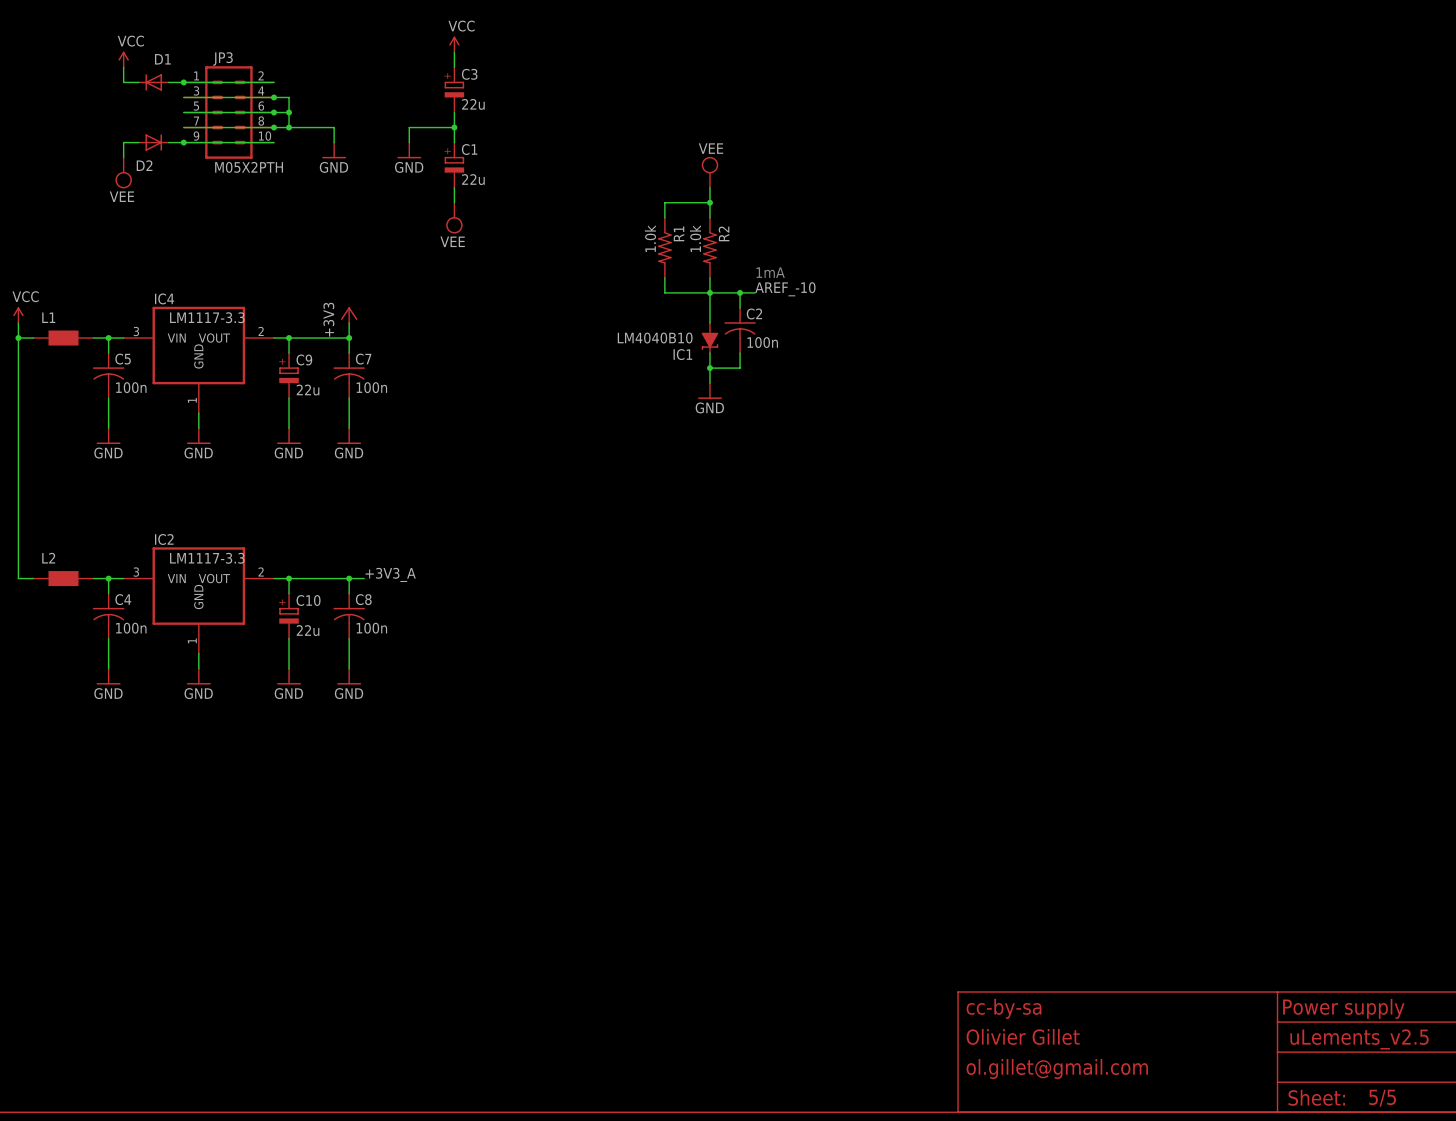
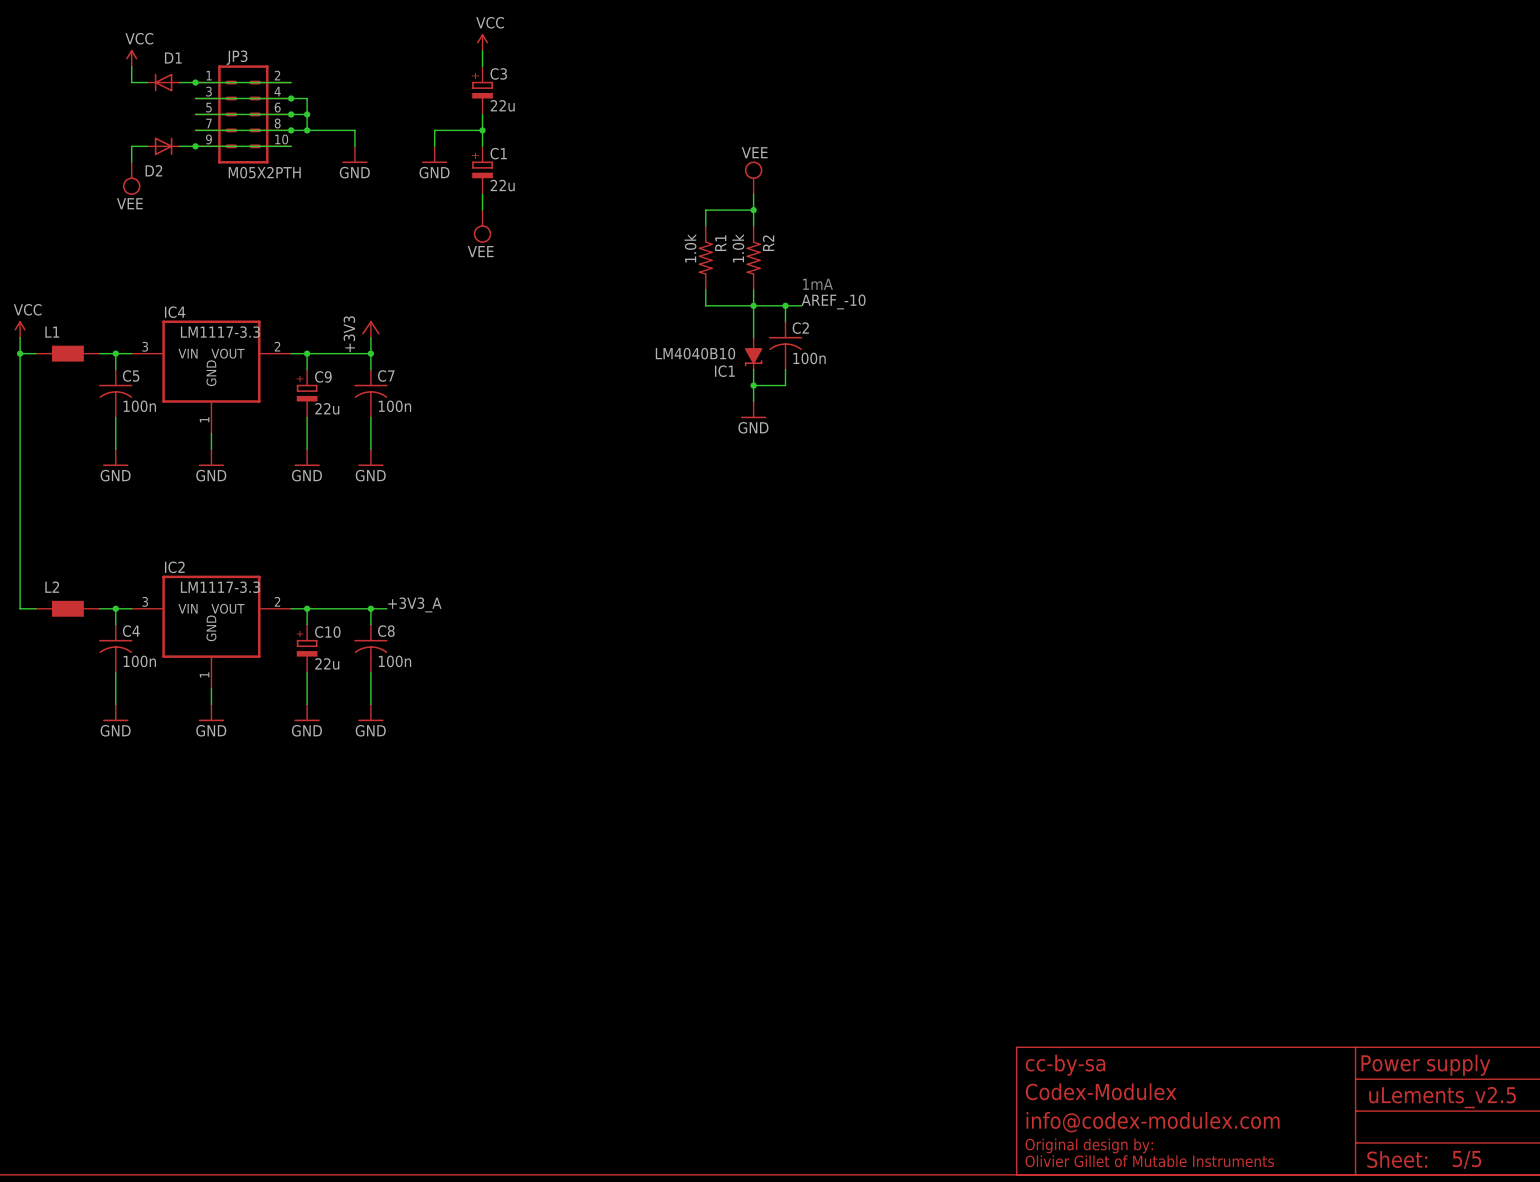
text: Olivier Gillet (1023, 1036) -> Codex-Modulex (1101, 1091)
text: none -> info@codex-modulex.com (1153, 1122)
text: ol.gillet@gmail.com (1057, 1069) -> none
text: none -> Original design by: (1089, 1145)
text: none -> Olivier Gillet of Mutable Instruments (1149, 1161)

